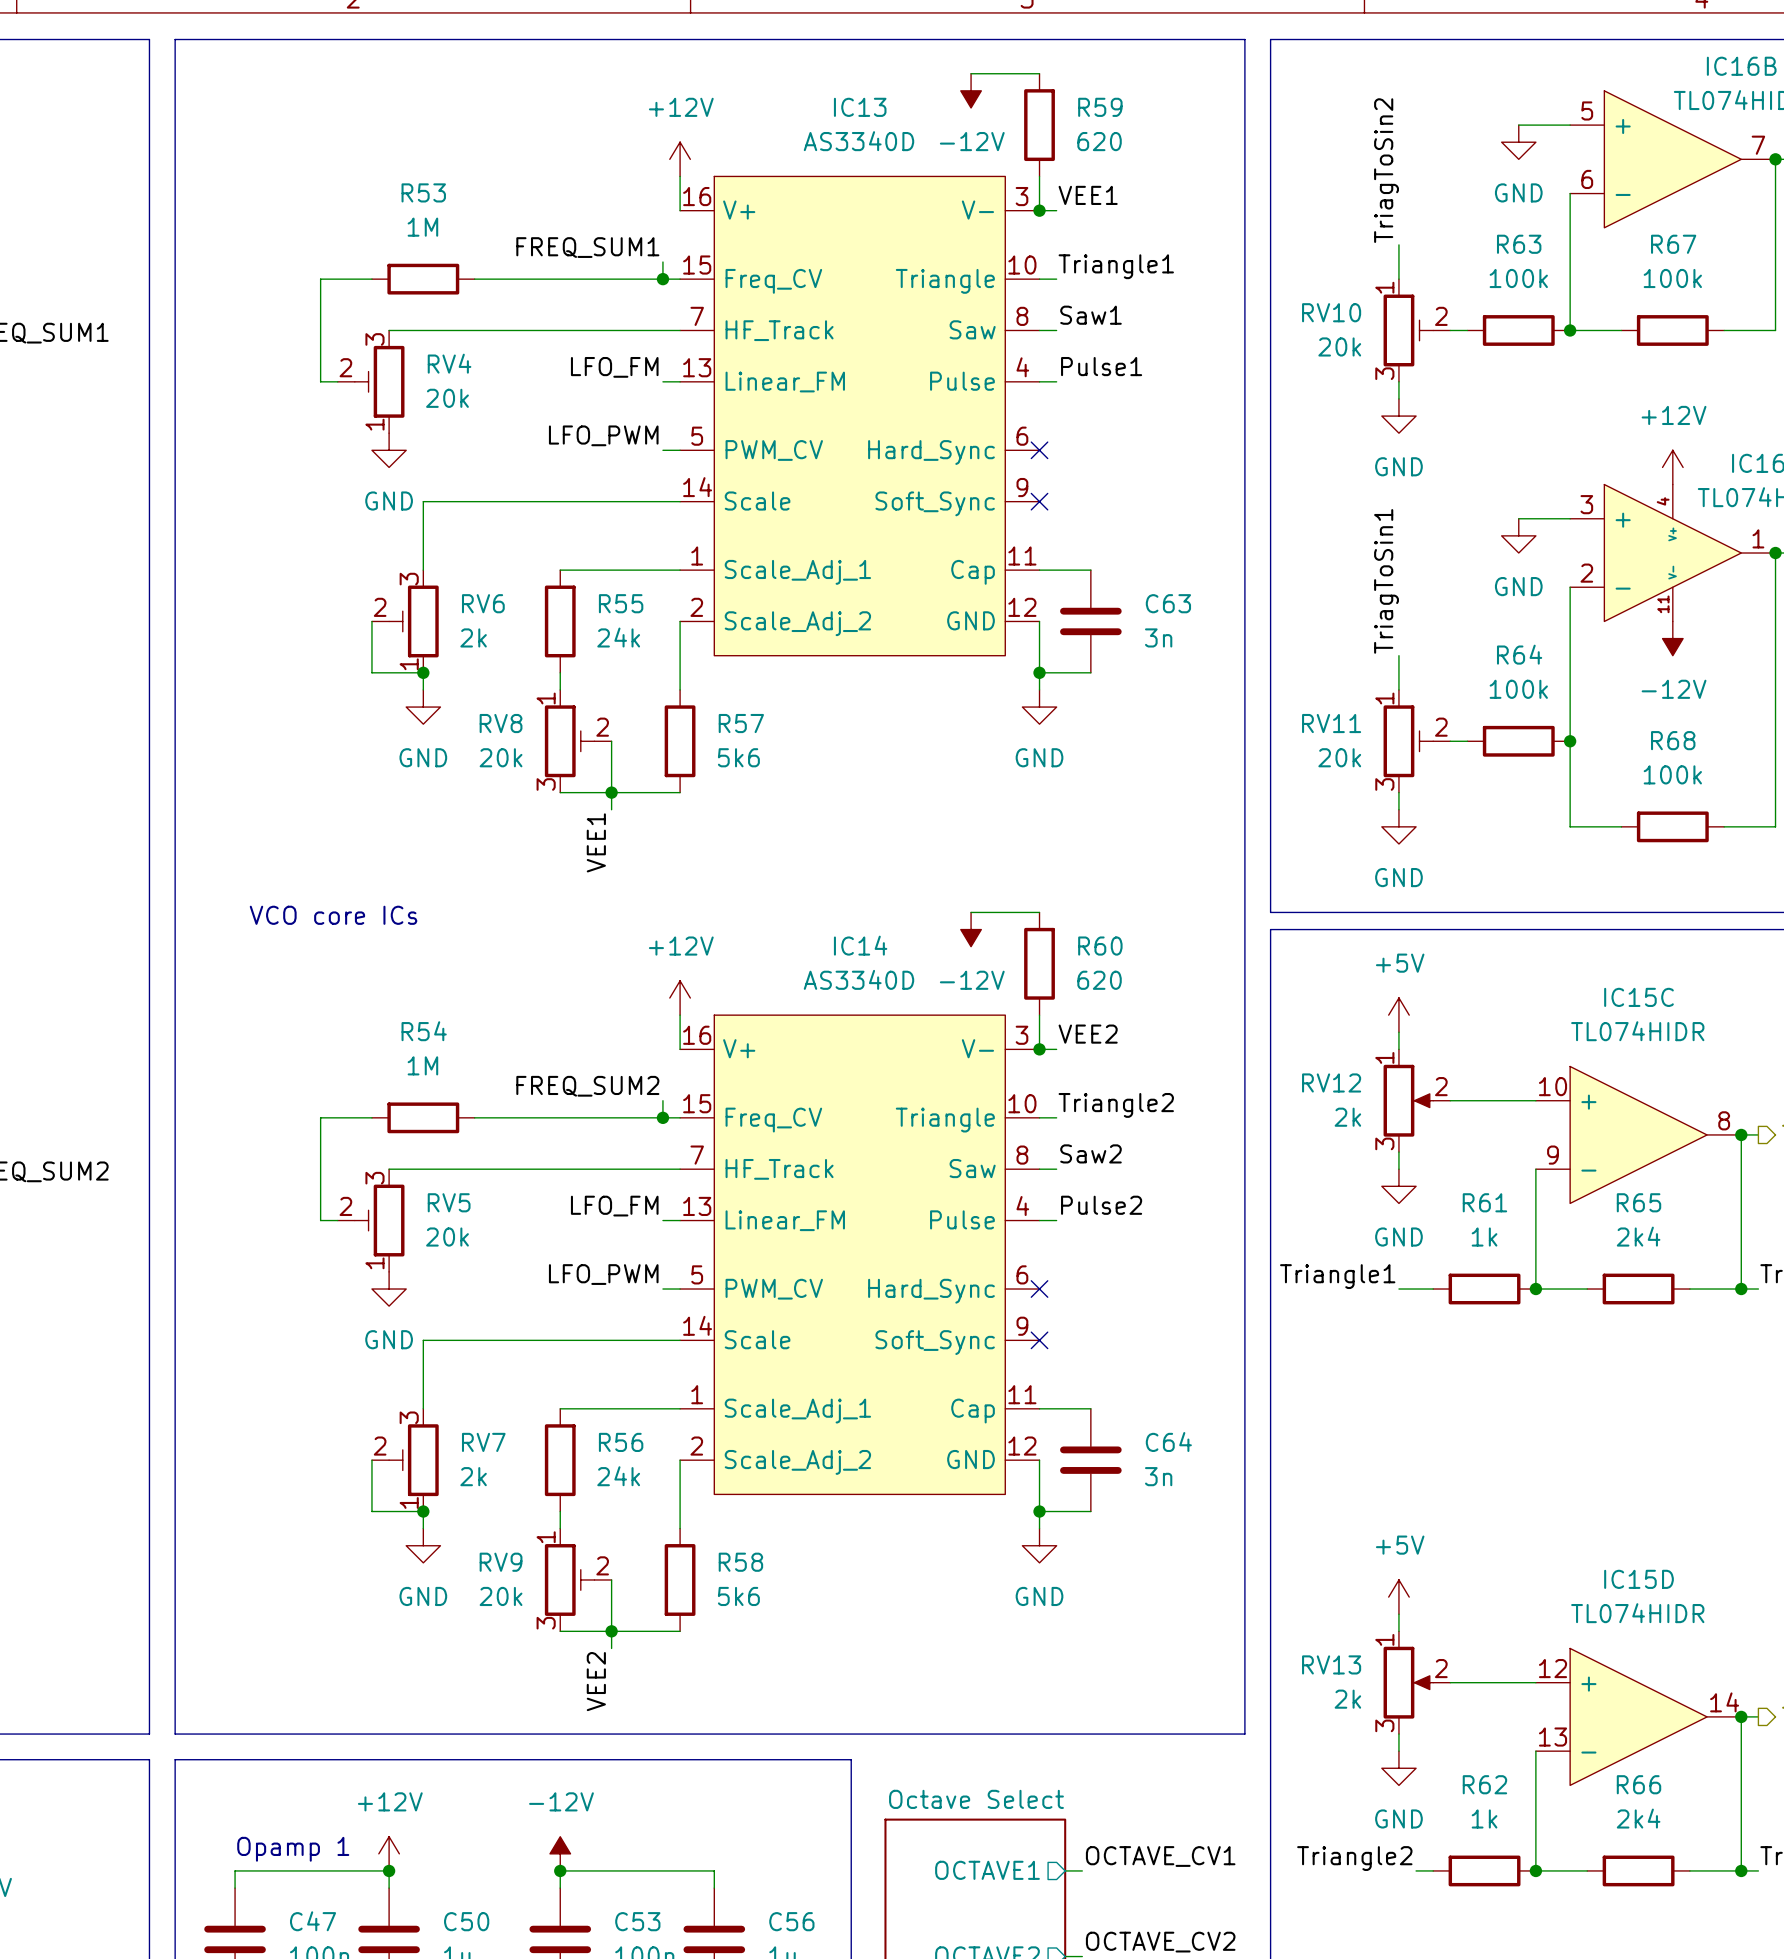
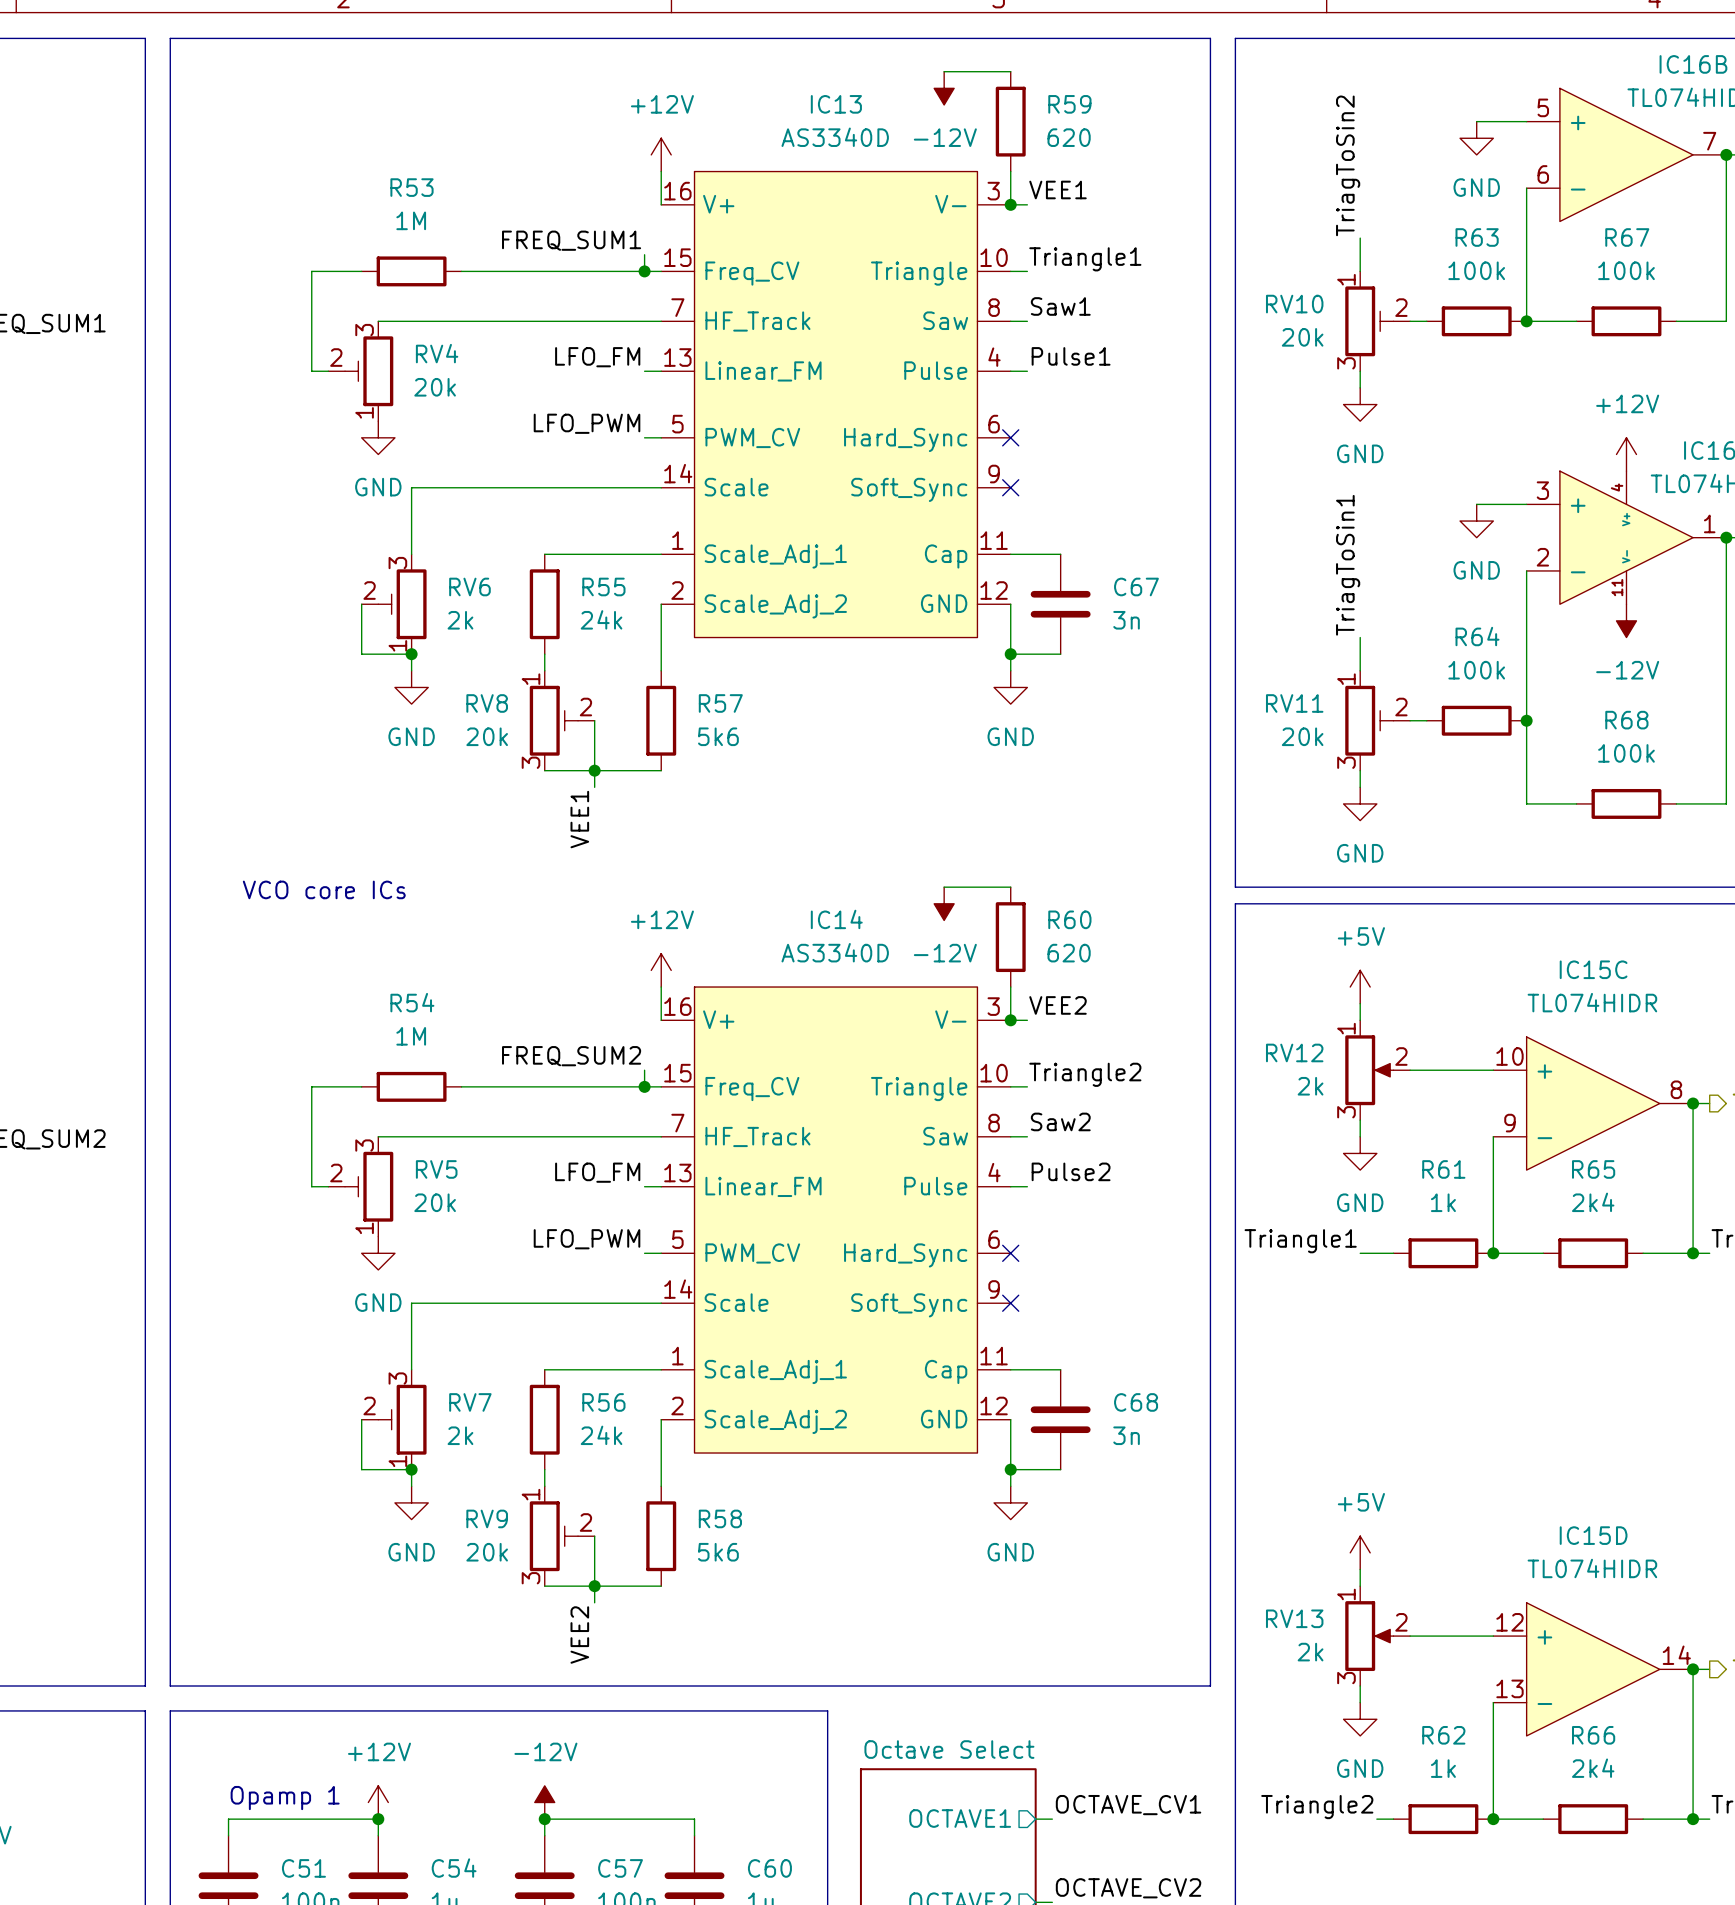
C63 name: C63 (1168, 603) -> C67 (1136, 586)
C64 name: C64 (1168, 1442) -> C68 (1136, 1402)
C47 name: C47 (313, 1921) -> C51 (303, 1868)
C50 name: C50 (466, 1921) -> C54 (454, 1868)
C53 name: C53 (637, 1921) -> C57 (620, 1868)
C56 name: C56 (791, 1921) -> C60 (769, 1868)

